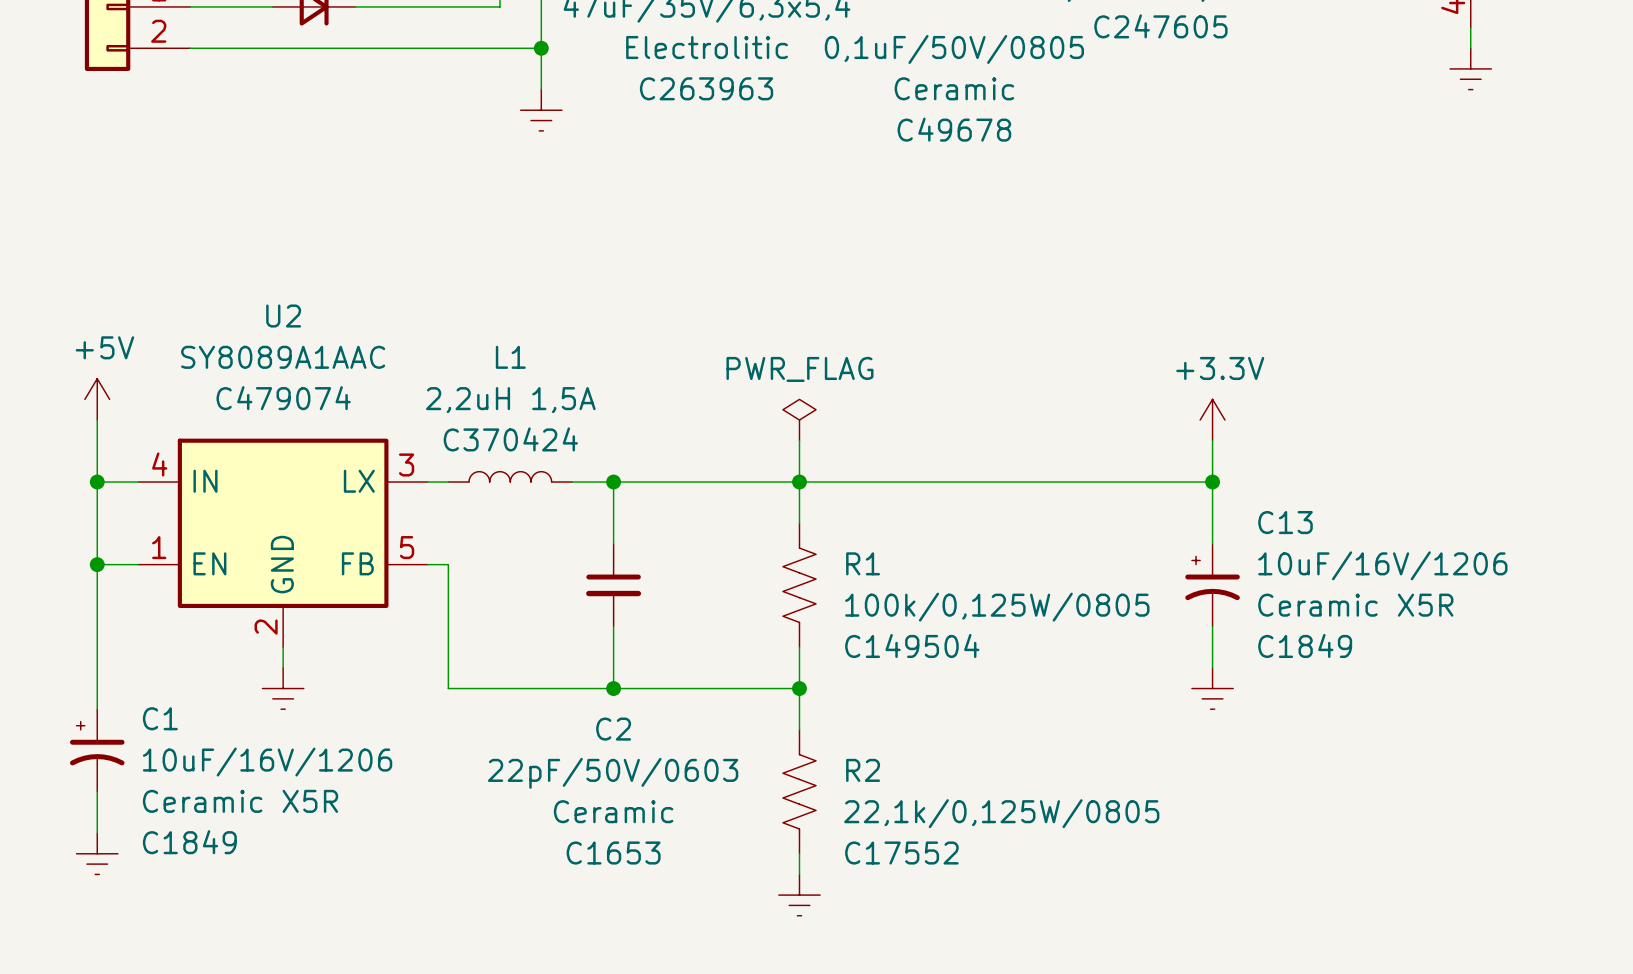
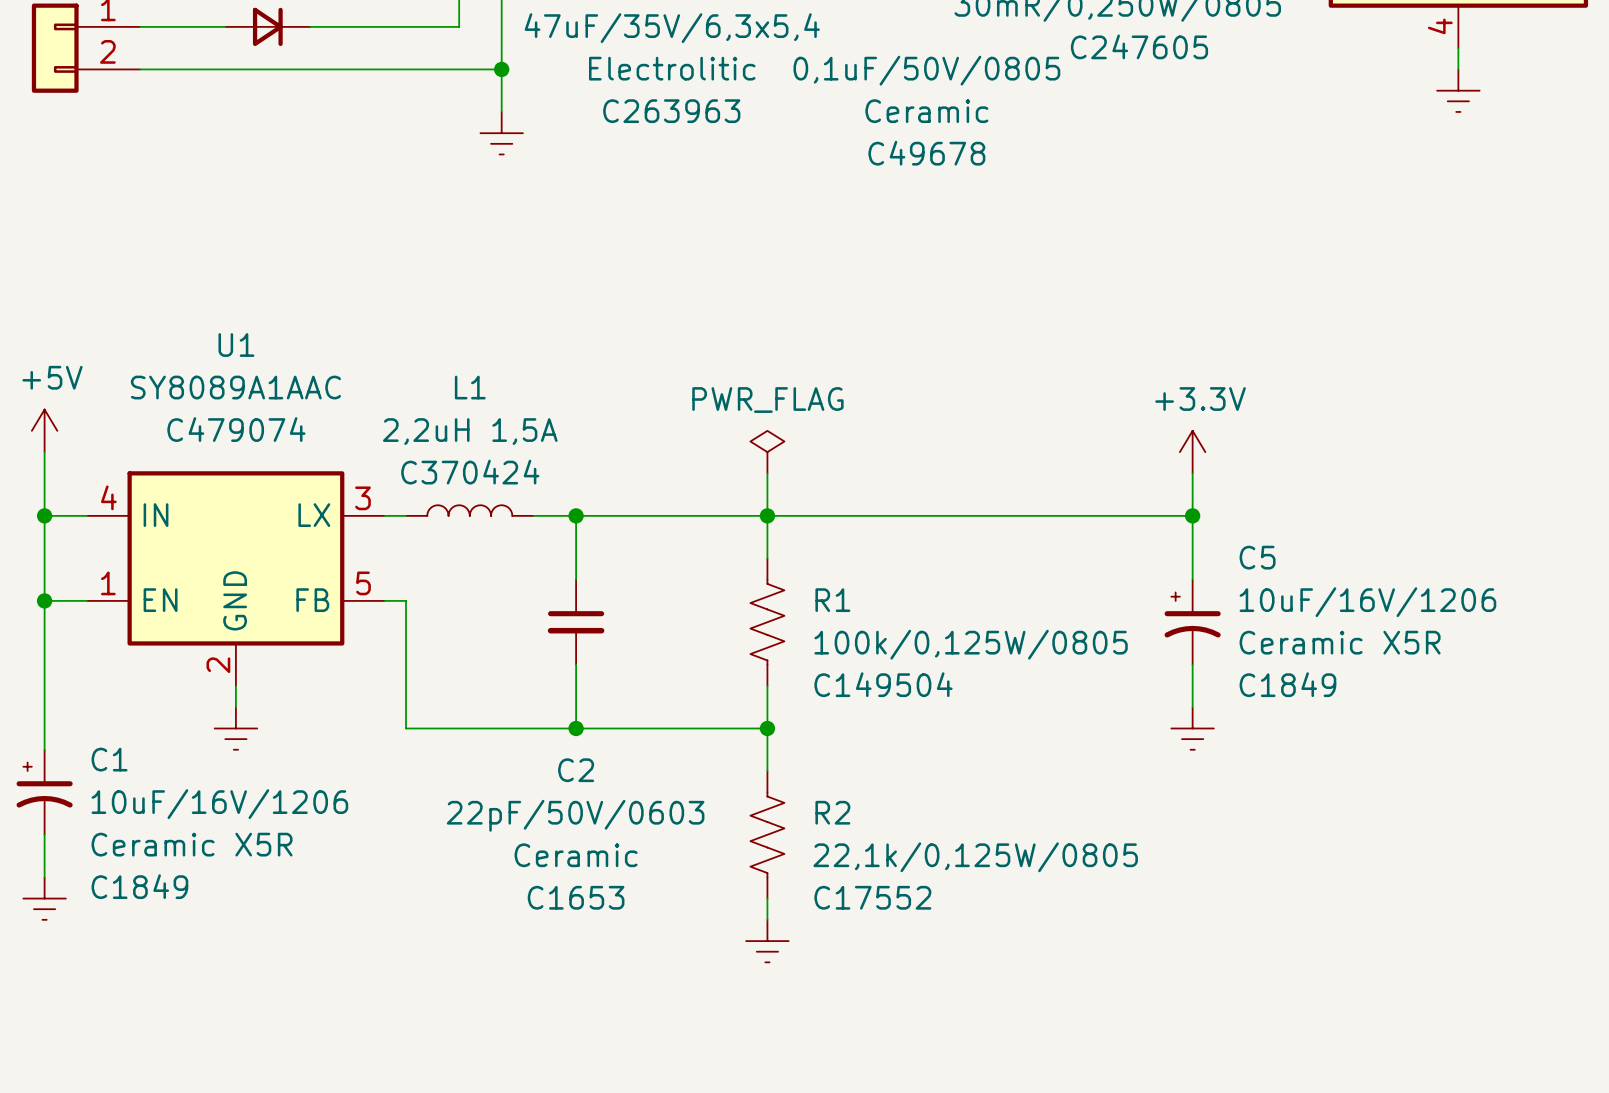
U2 name: U2 (283, 316) -> U1 (236, 345)
C13 name: C13 (1285, 522) -> C5 (1257, 557)

